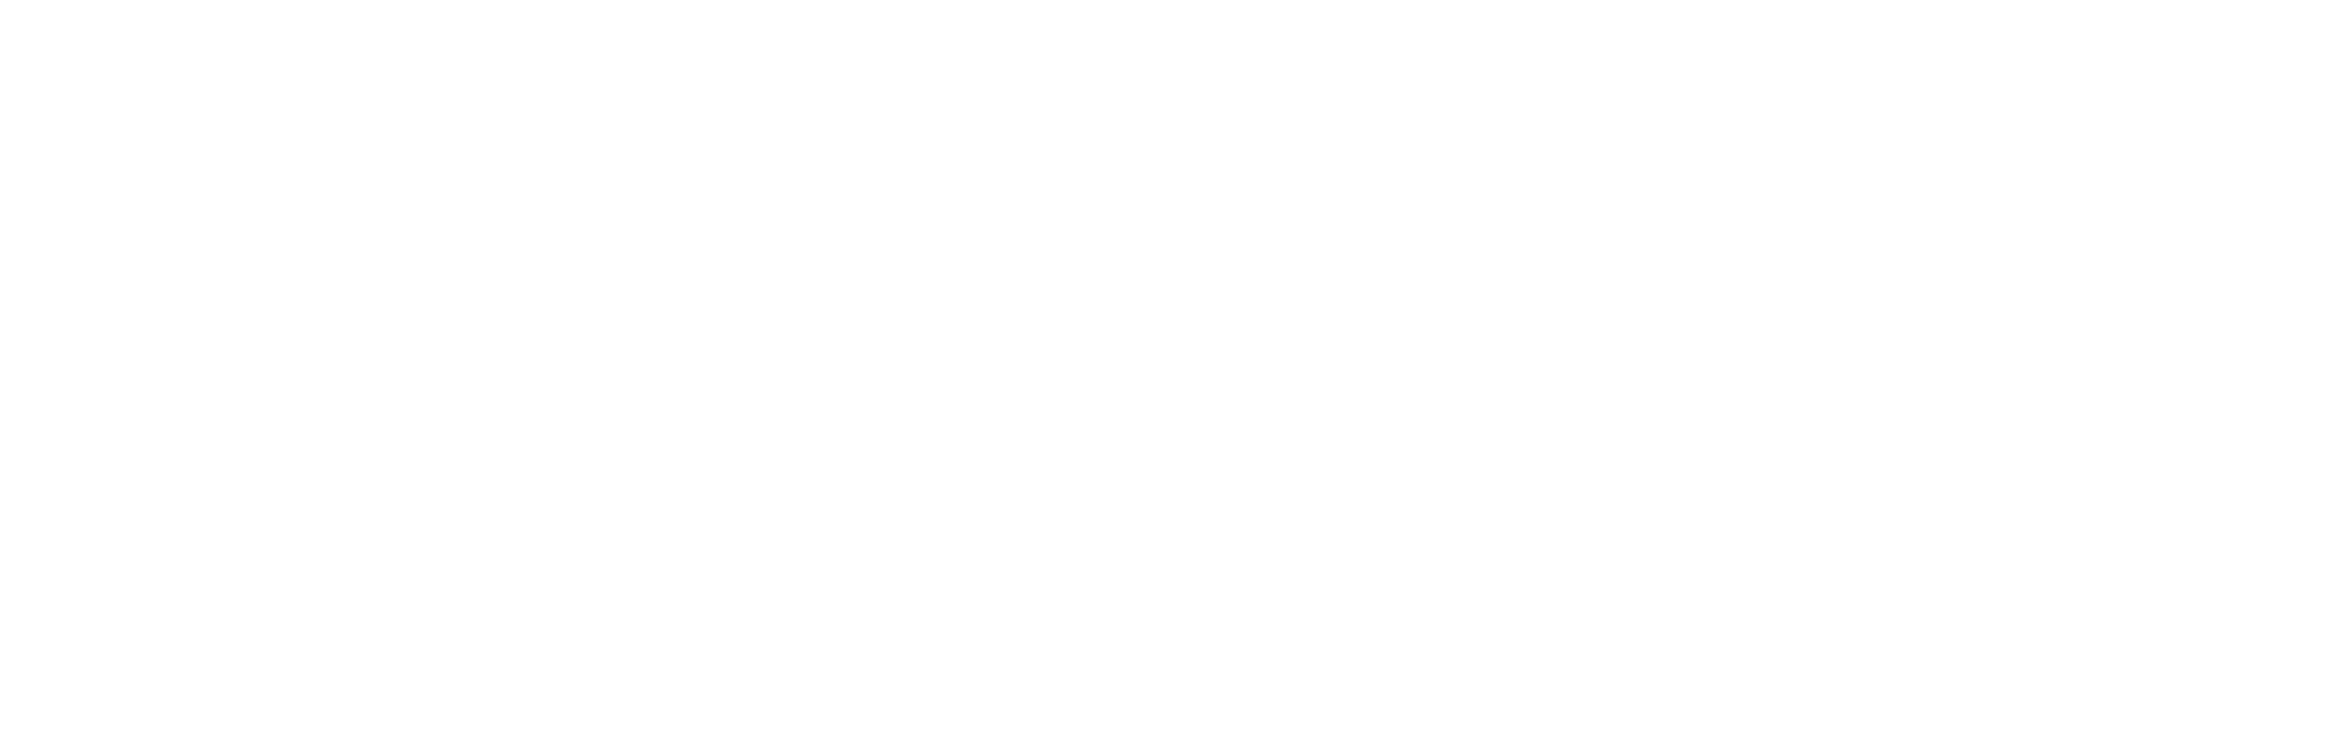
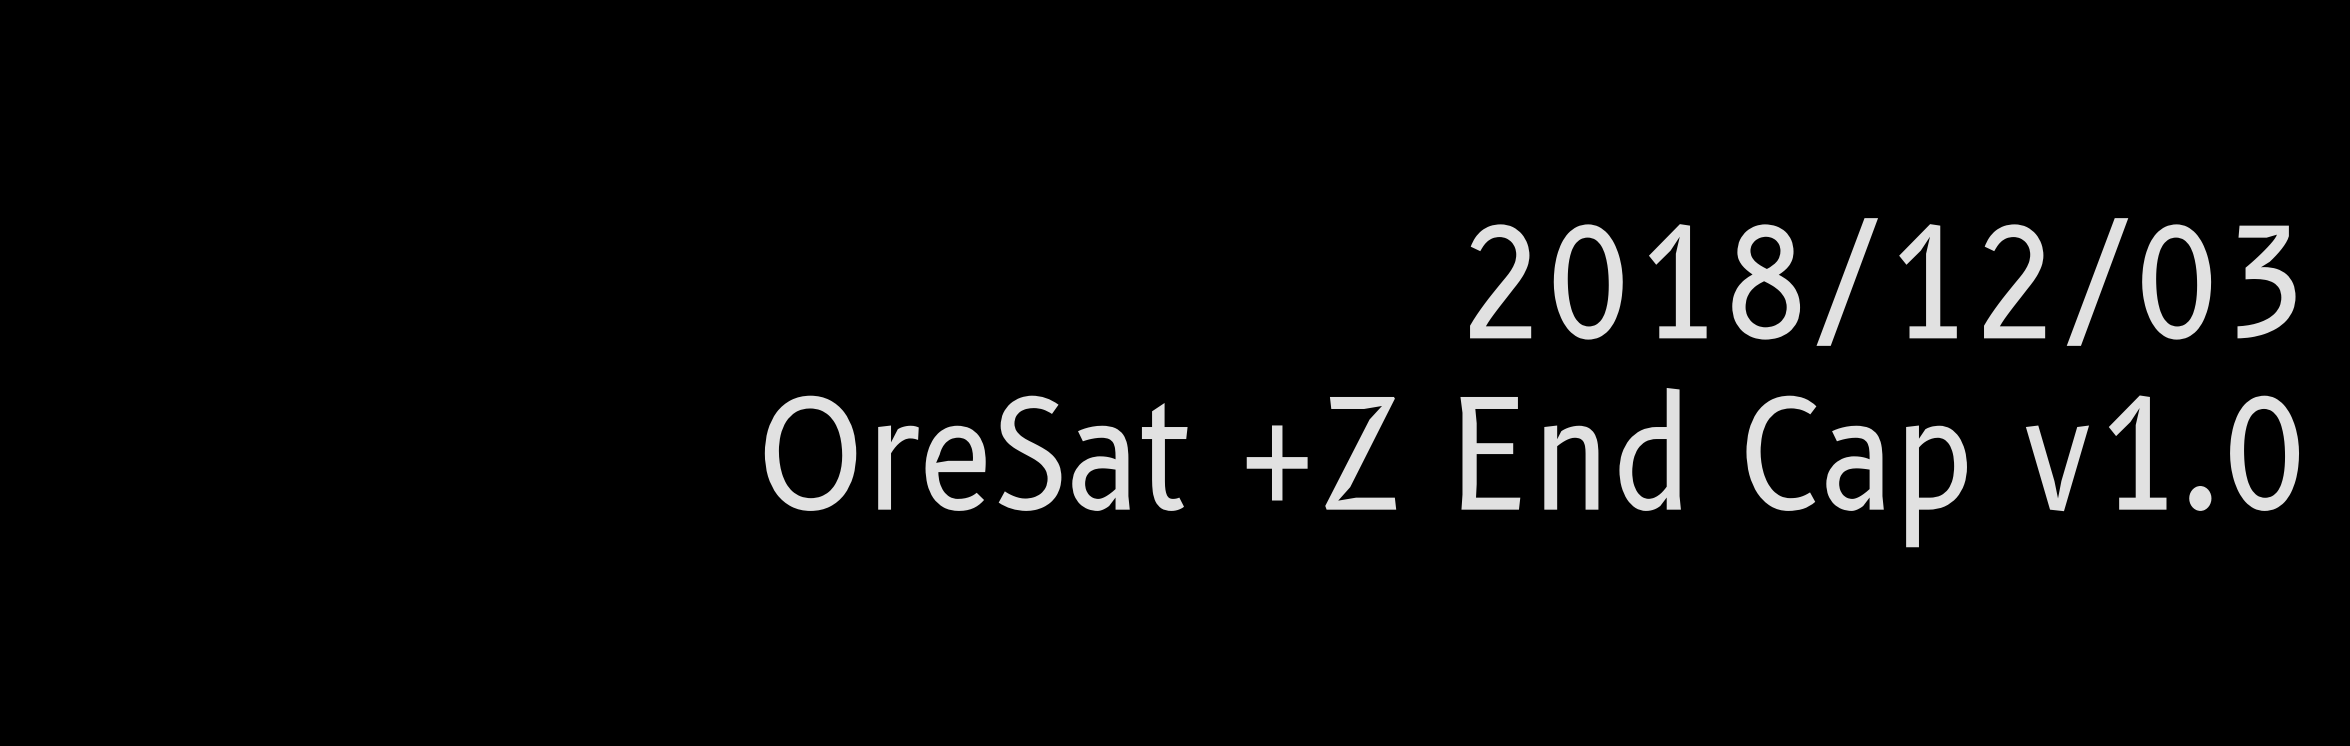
text: none -> 2018/12/03 (1882, 281)
text: none -> OreSat +Z End Cap v1.0 (1531, 467)

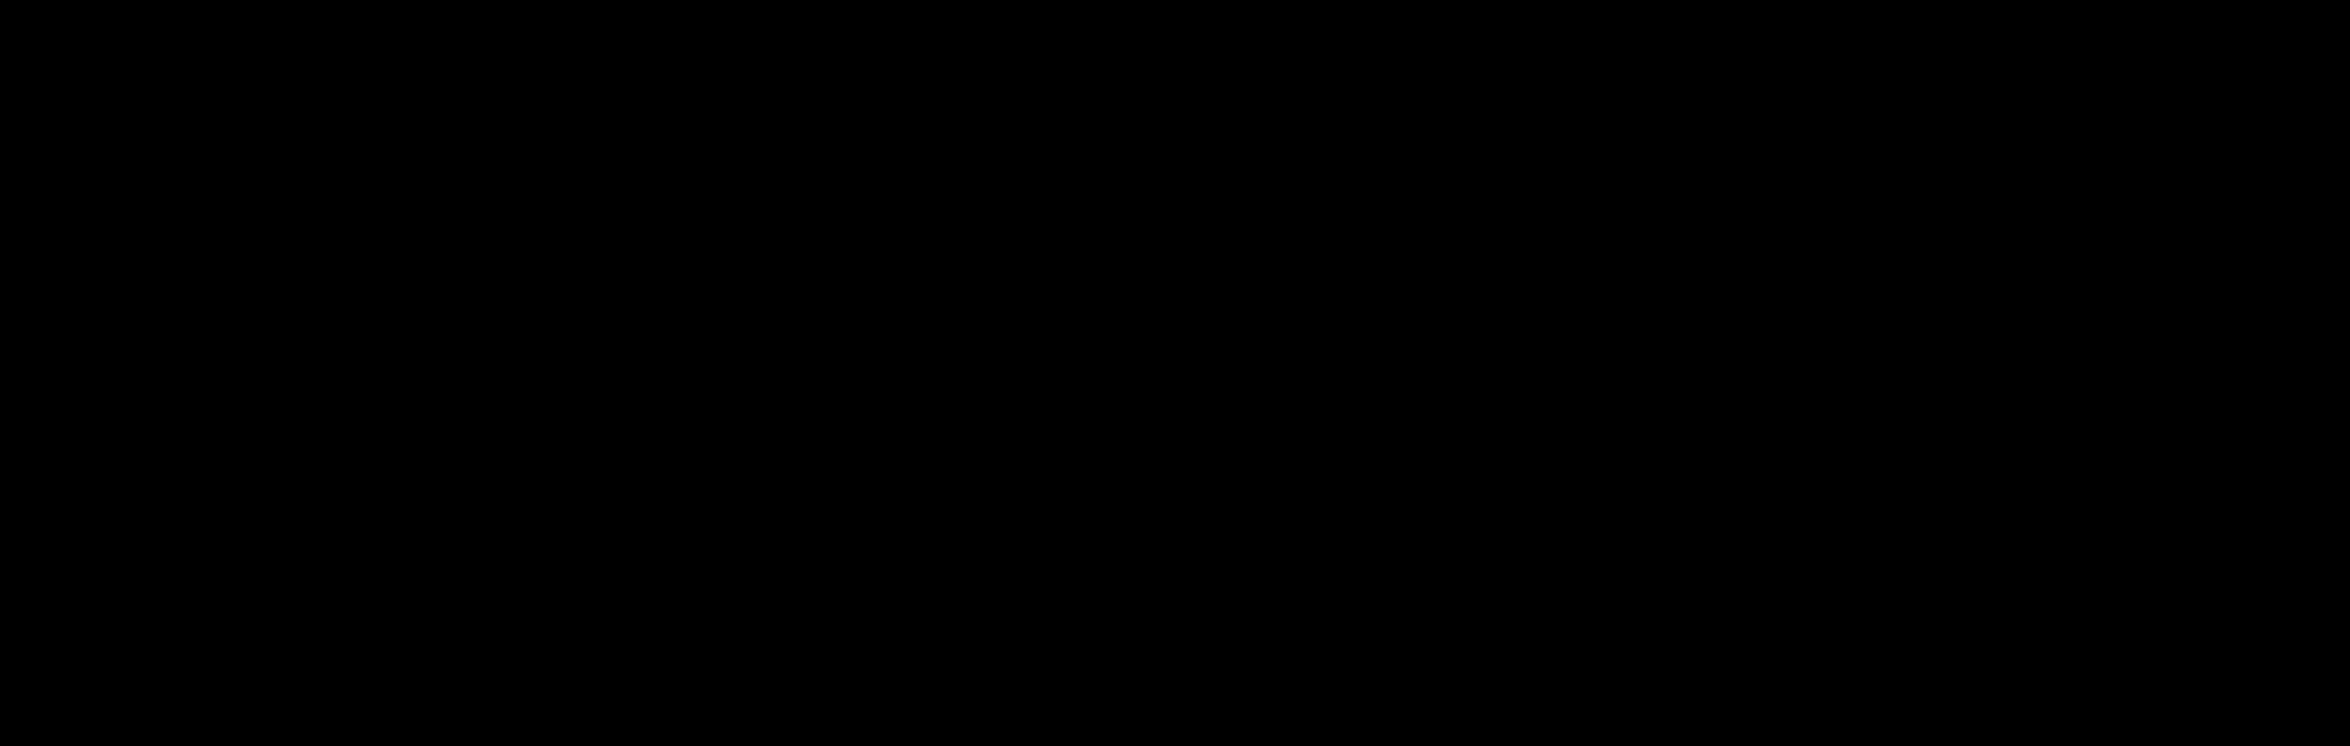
text: 2018/12/03 (1882, 281) -> none
text: OreSat +Z End Cap v1.0 (1531, 467) -> none

